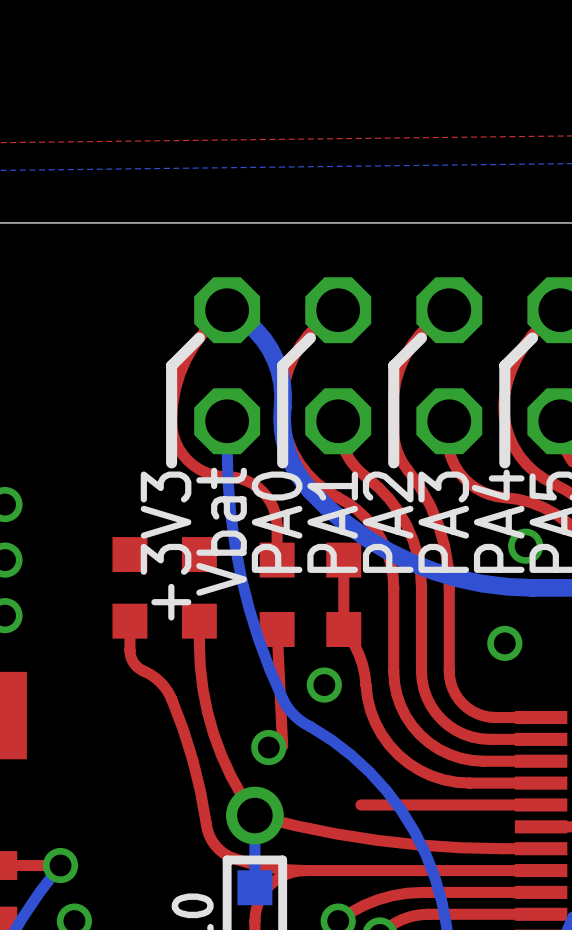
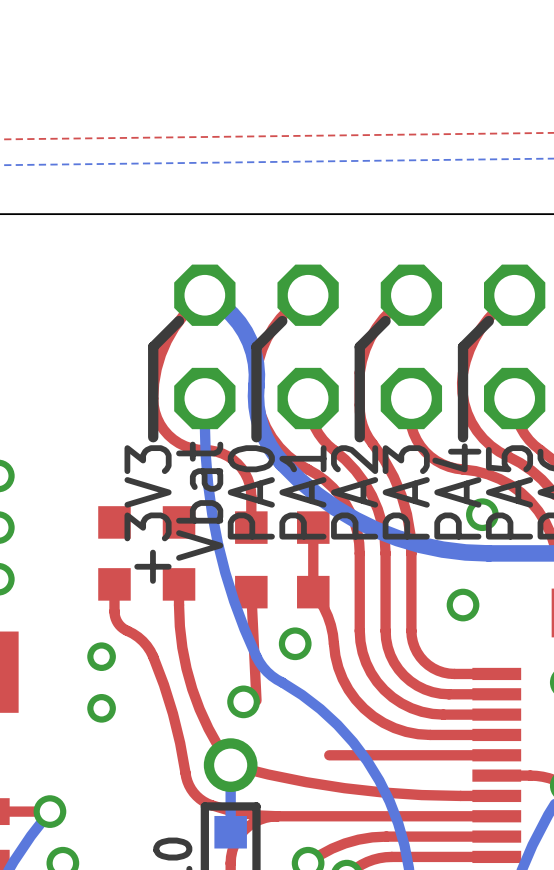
via: none -> (101, 656)
via: none -> (101, 708)

